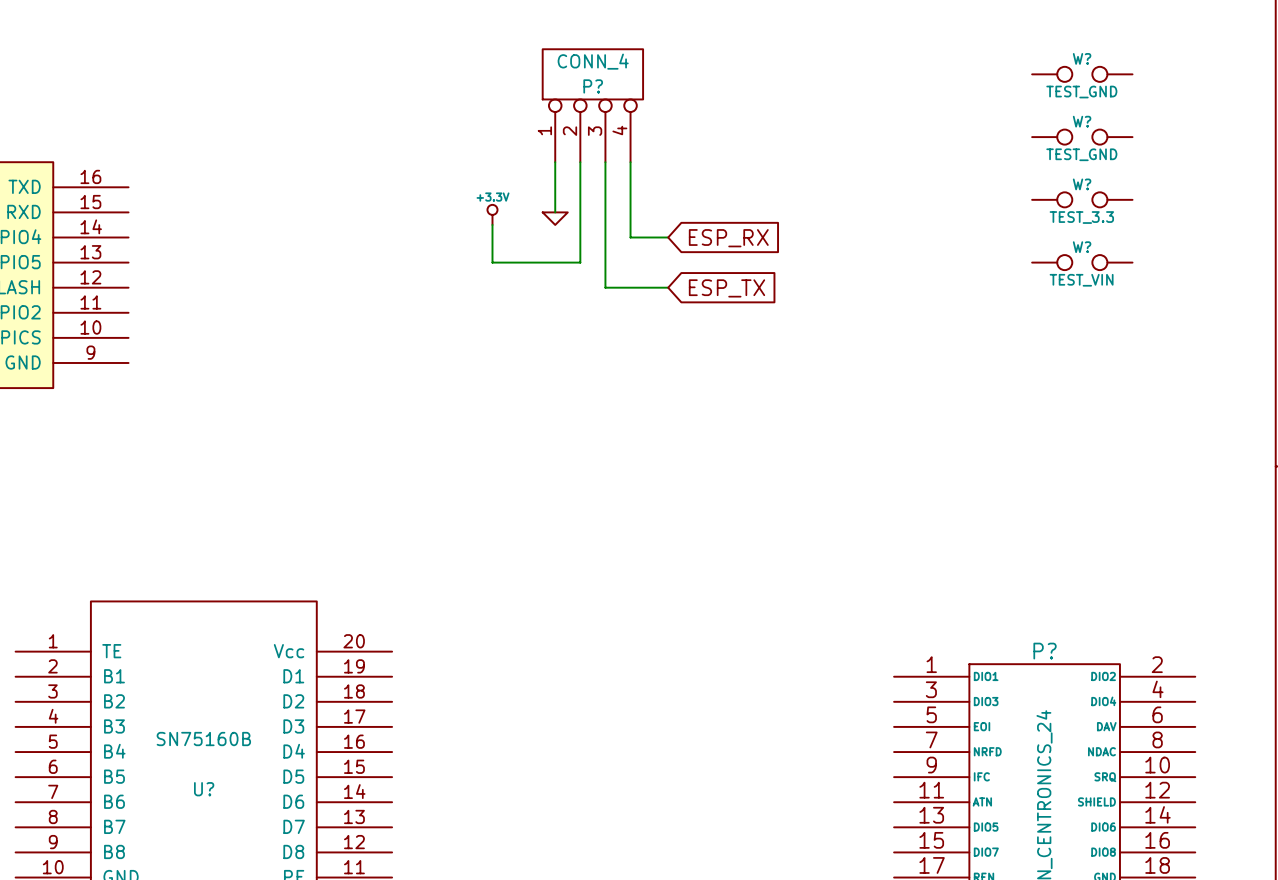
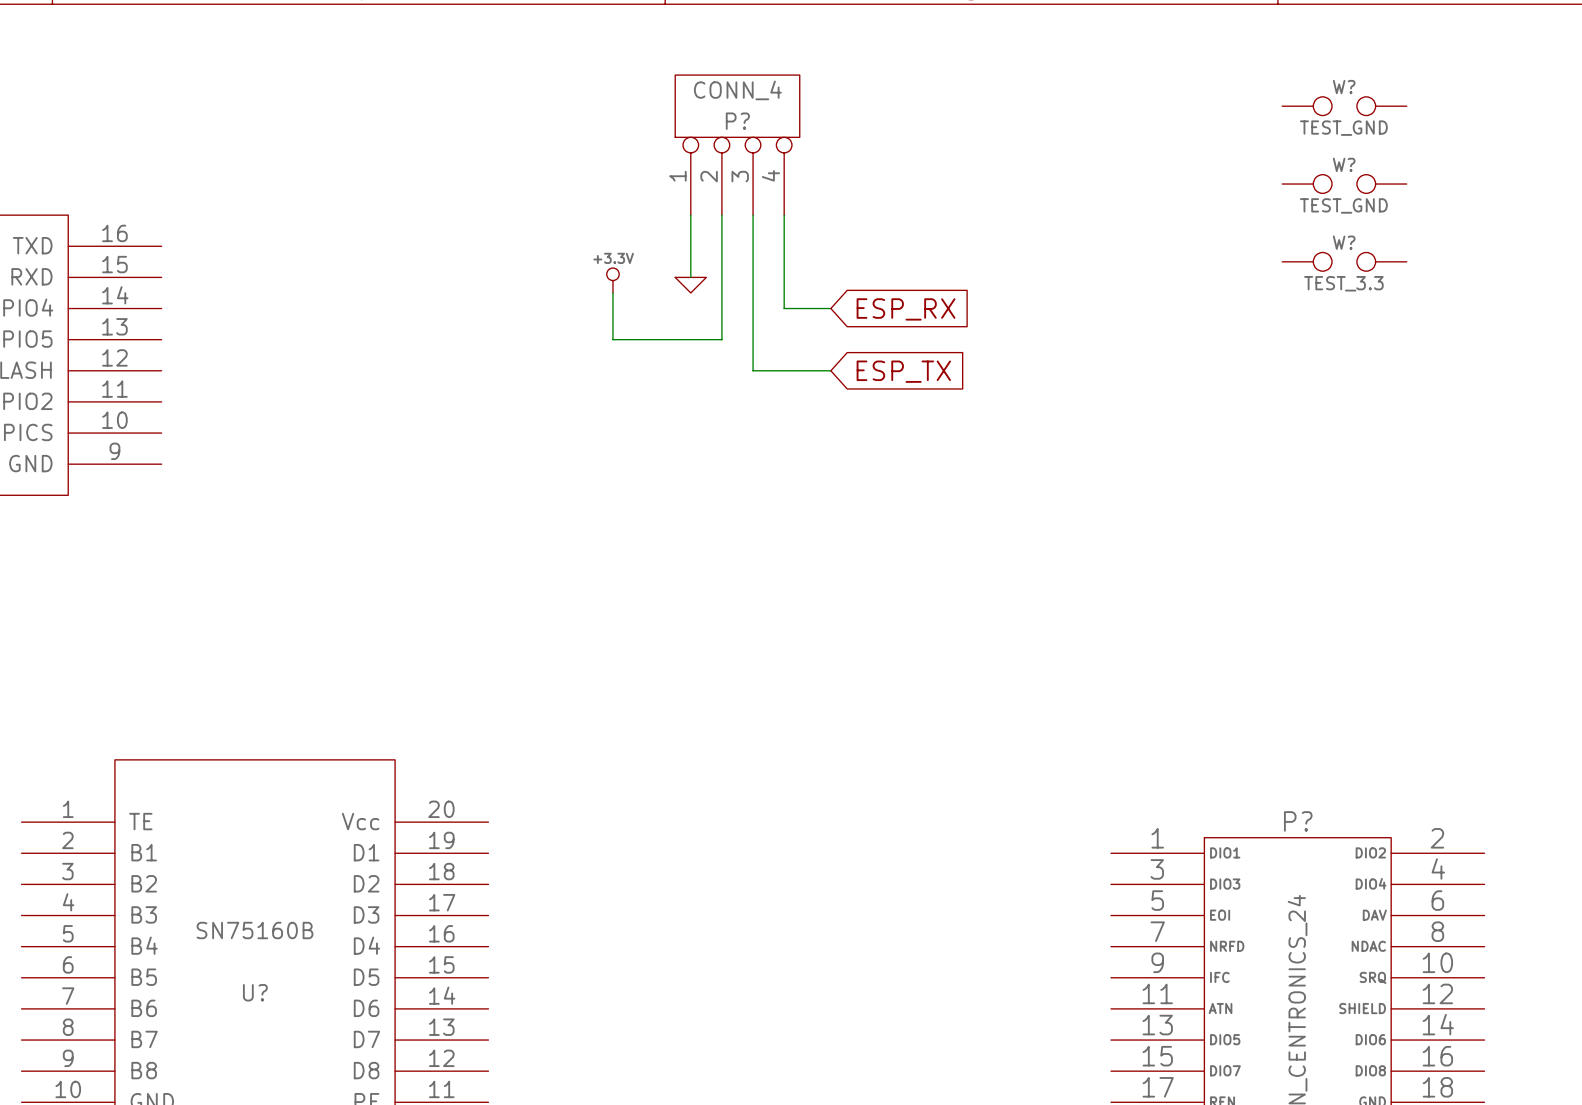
W?: TEST_VIN (1082, 262) -> none

